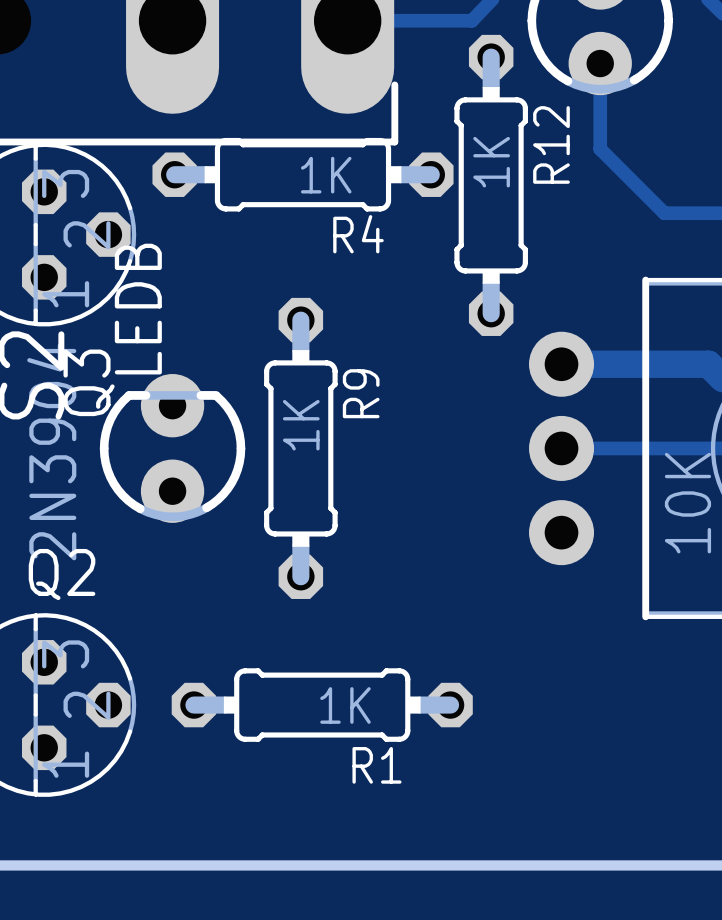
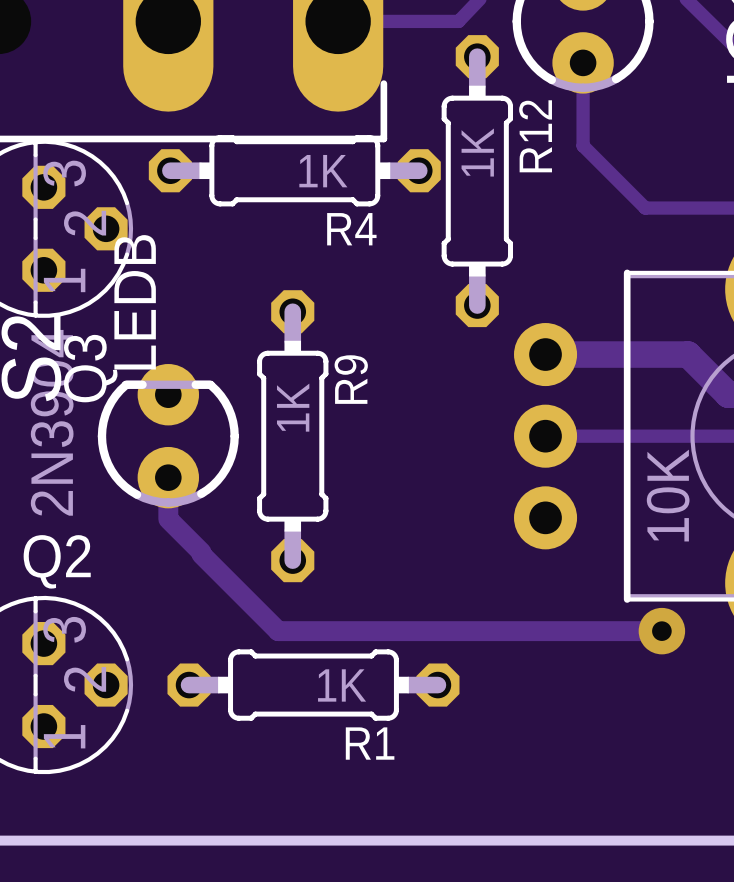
track: none -> (168, 477) (168, 519) (278, 631) (661, 631)
via: none -> (661, 631)

